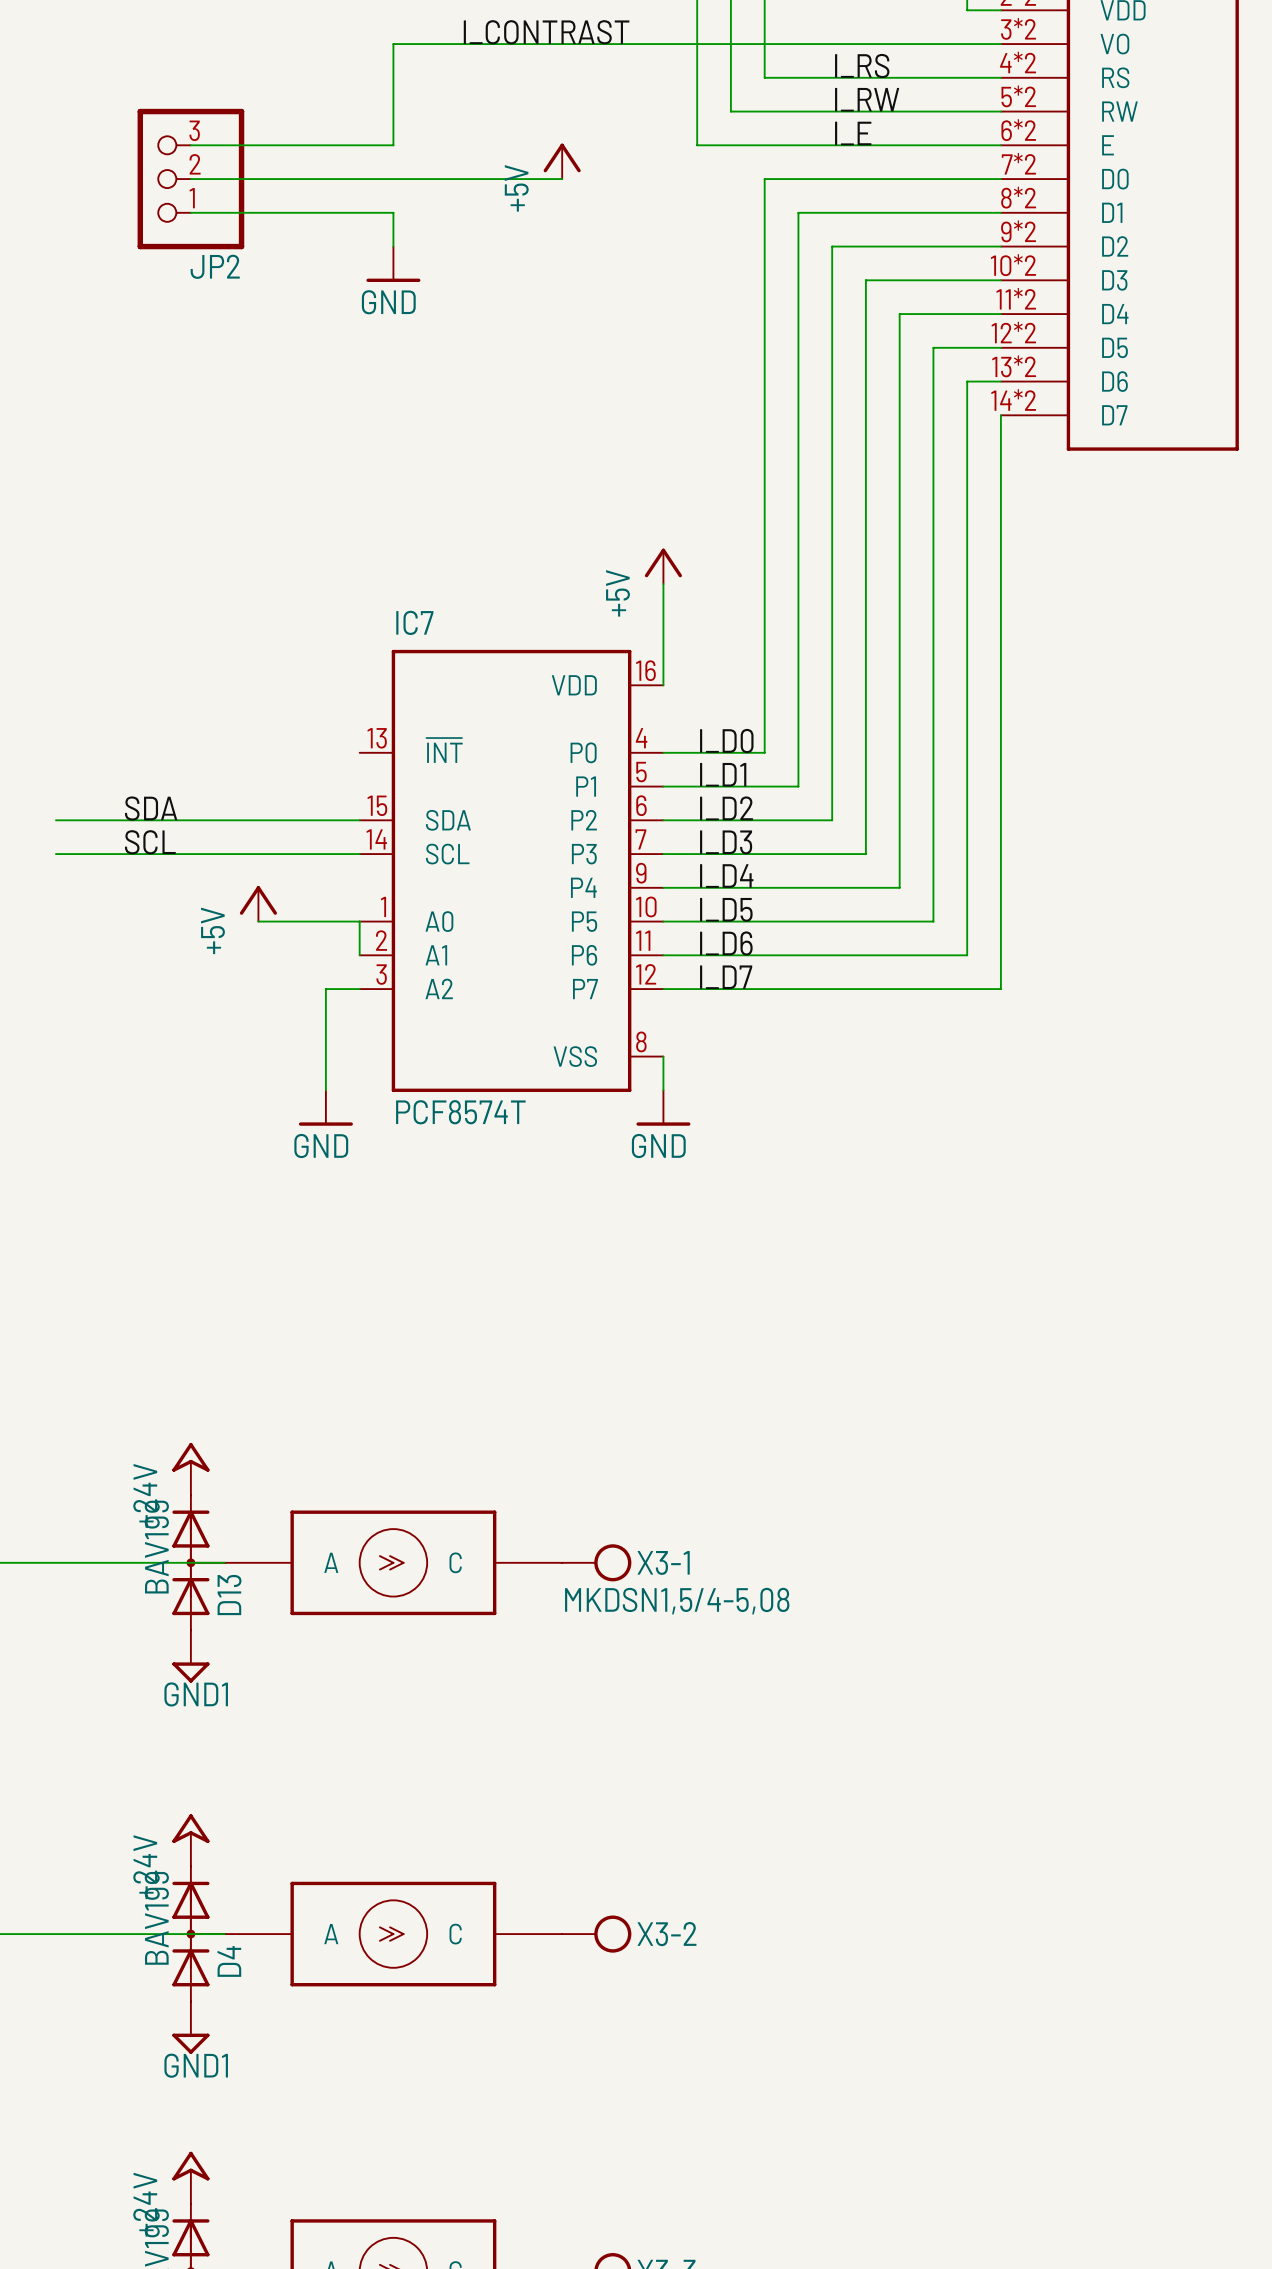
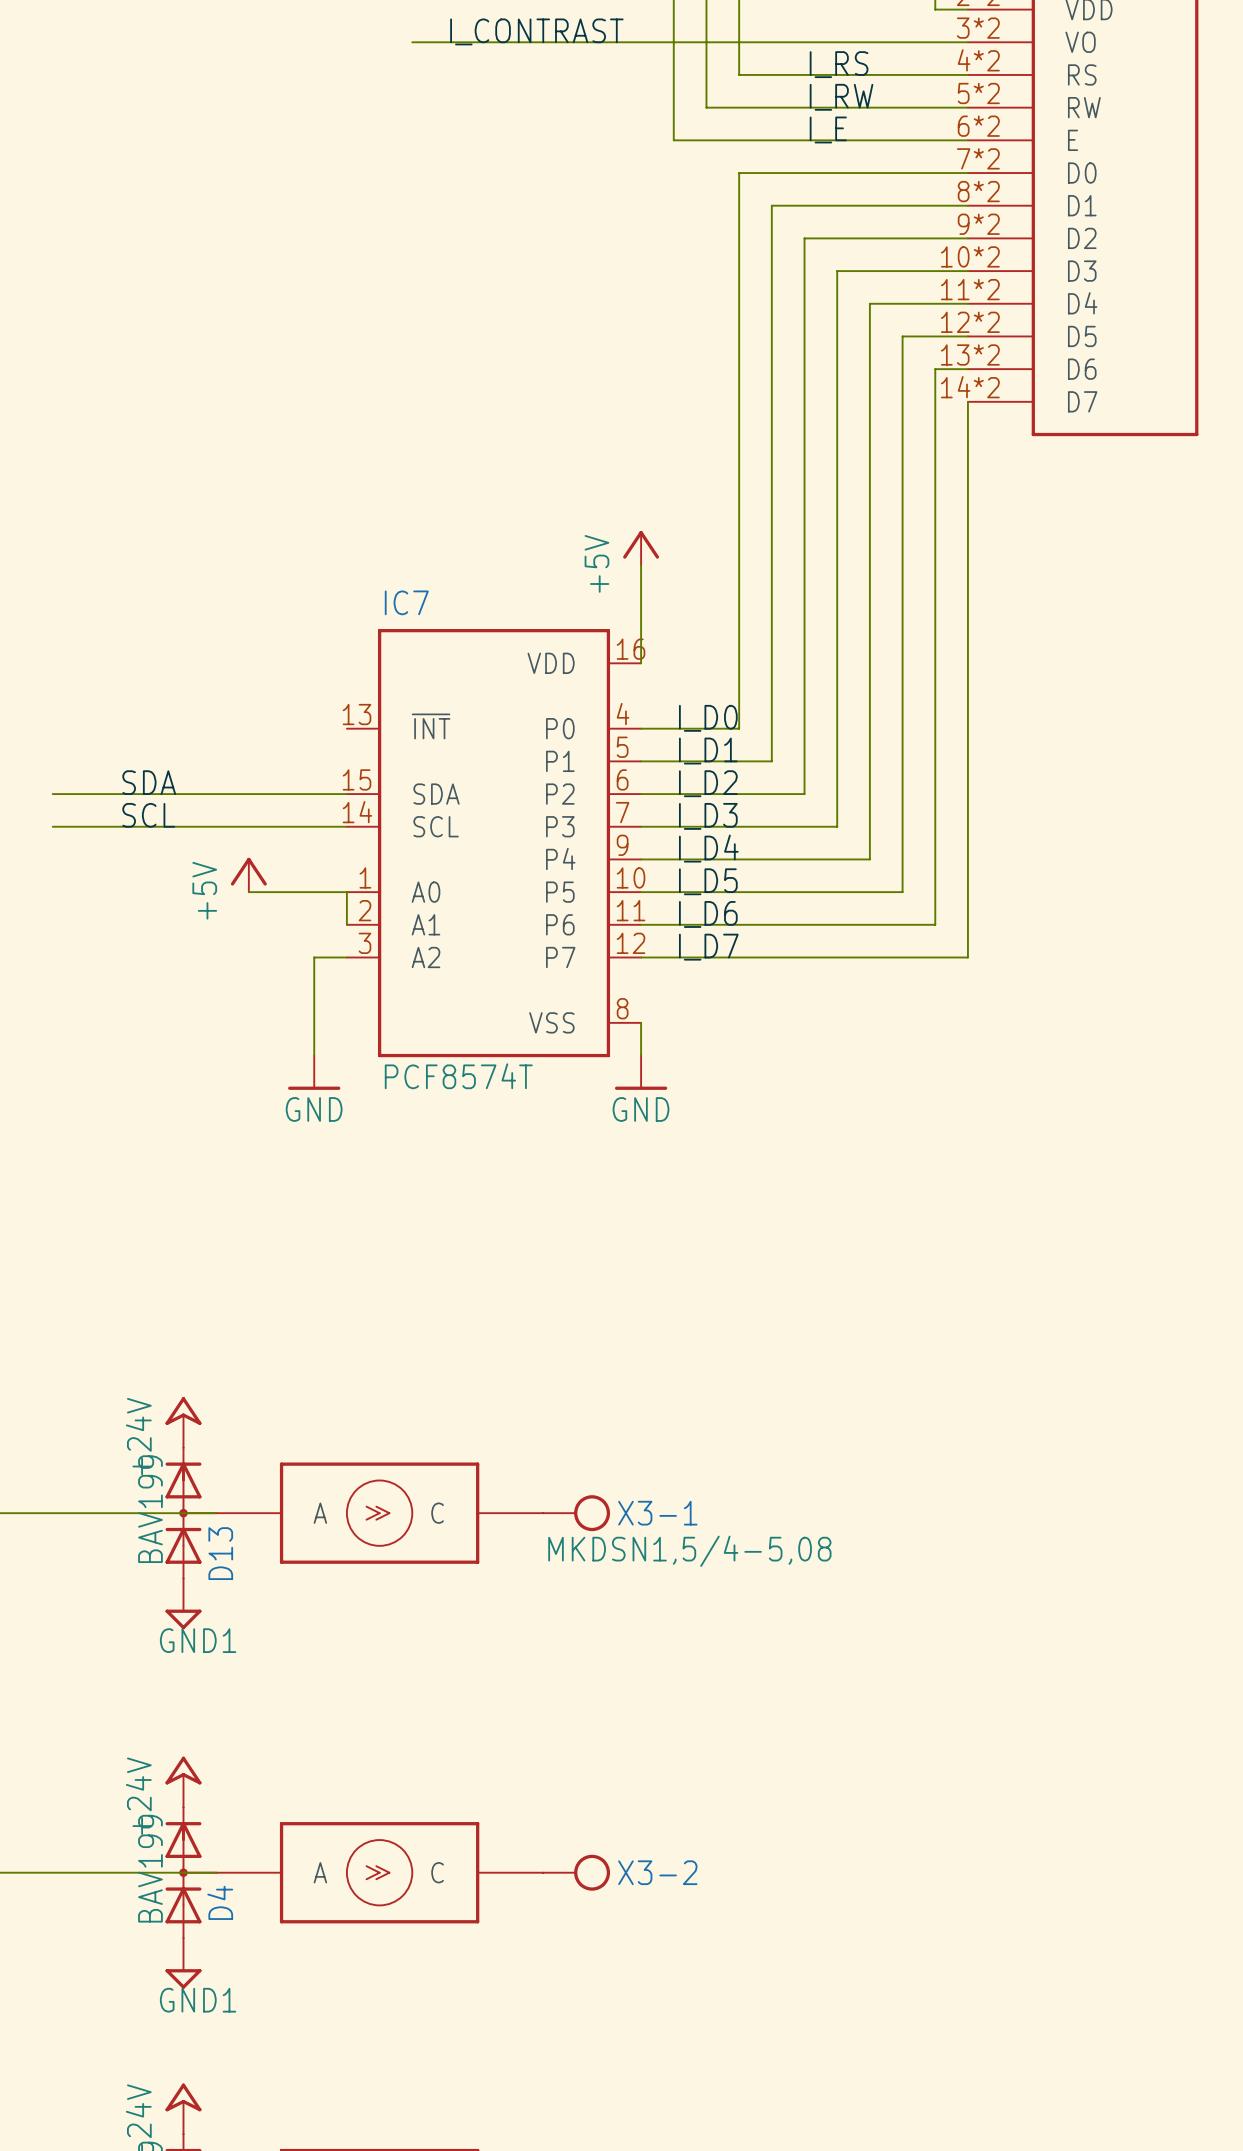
wire: (427, 44) (393, 44) (393, 145) (190, 145) -> none
power symbol: +5V (562, 161) -> none
wire: (190, 179) (562, 179) -> none
JP2: (190, 179) -> none
wire: (190, 212) (393, 212) (393, 246) -> none
power symbol: GND (393, 264) -> none

